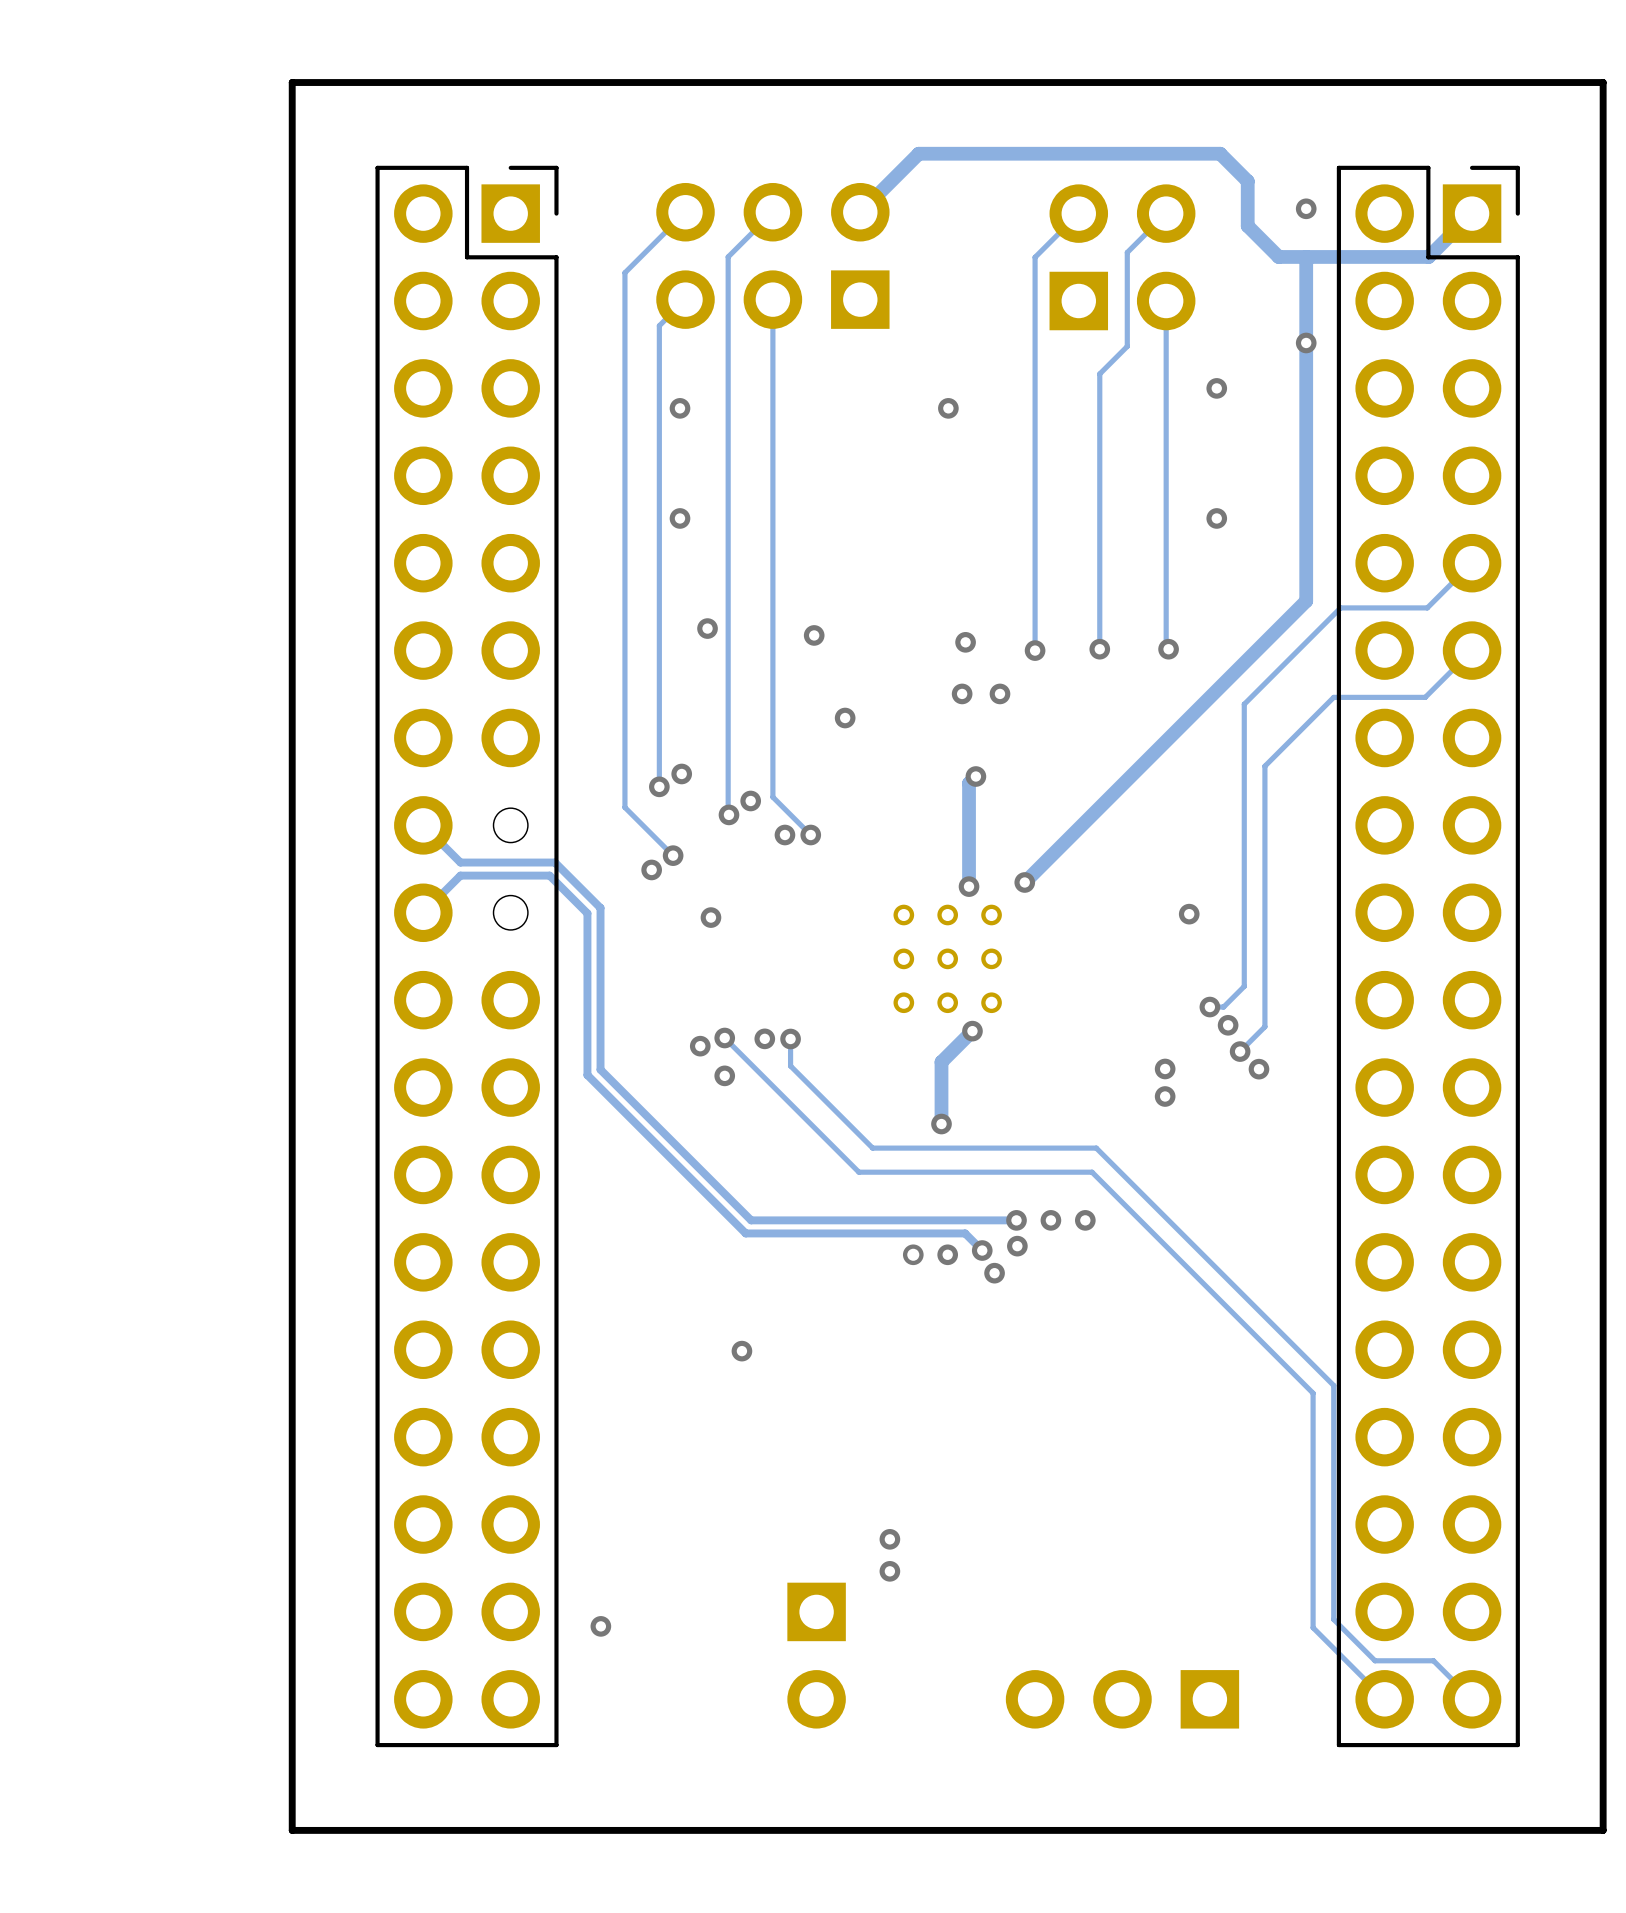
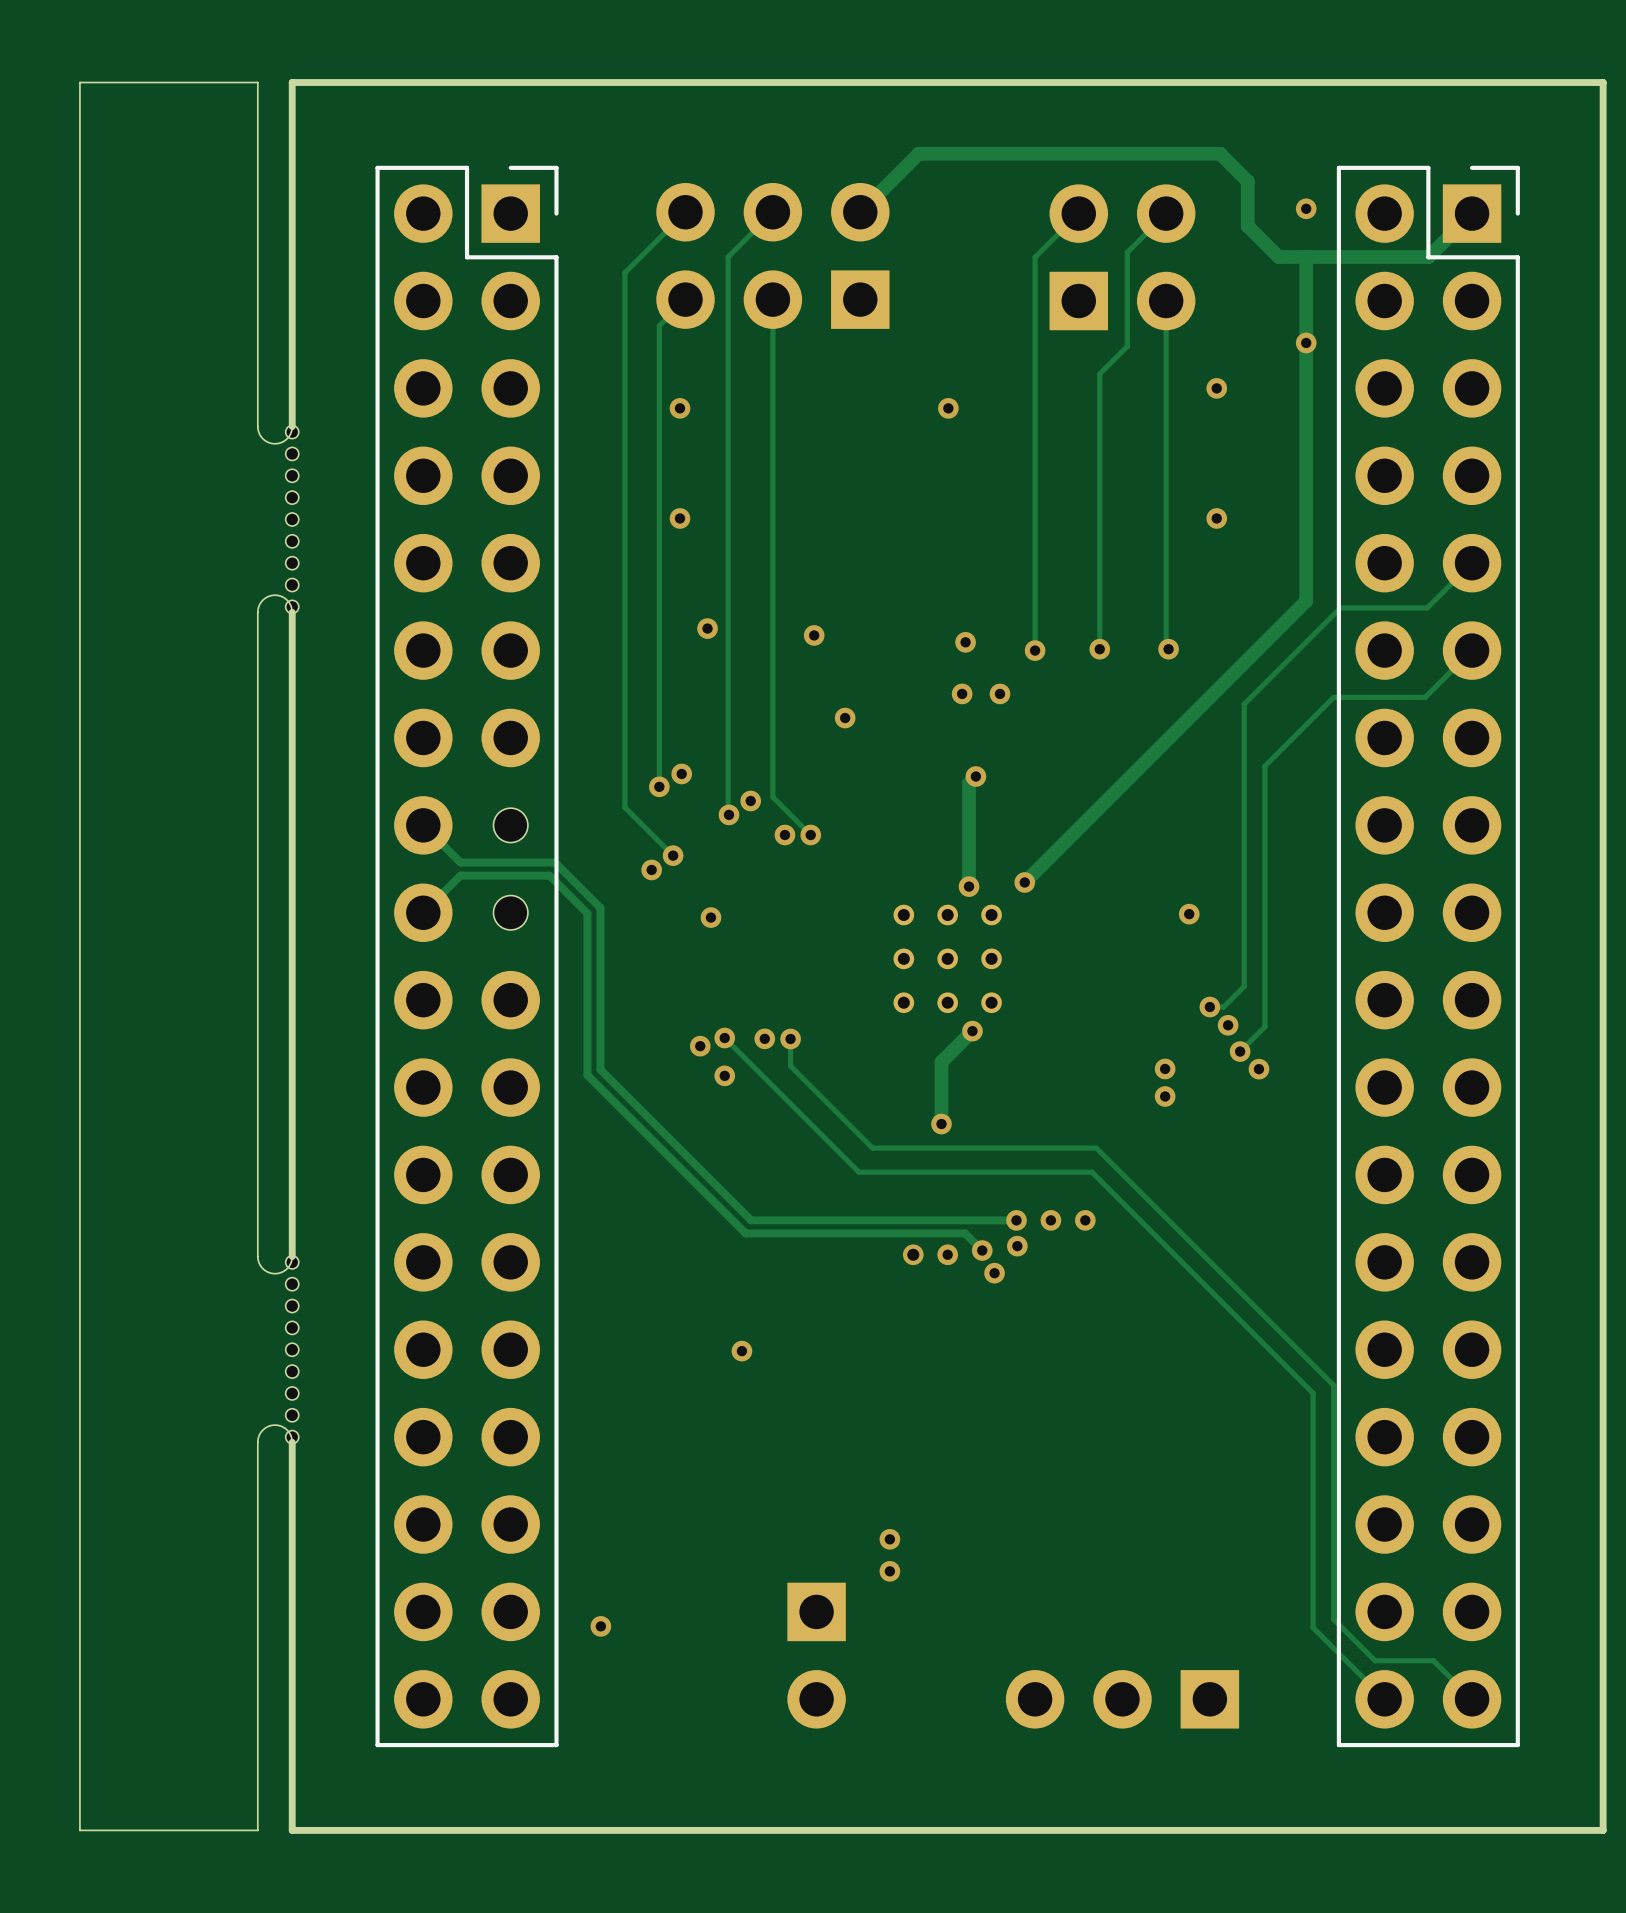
board edge: (292, 426) (292, 612) -> (292, 1256) (287, 1267) (275, 1273) (263, 1269) (257, 1256) (257, 612) (262, 600) (275, 595) (287, 600) (292, 612)
part: none -> (292, 519)
board edge: (292, 1256) (292, 1442) -> (292, 426) (287, 438) (277, 443) (263, 439) (257, 428) (257, 82) (79, 82) (79, 1830) (257, 1830) (257, 1440) (263, 1429) (277, 1425) (287, 1430) (292, 1442)
part: none -> (292, 1349)

